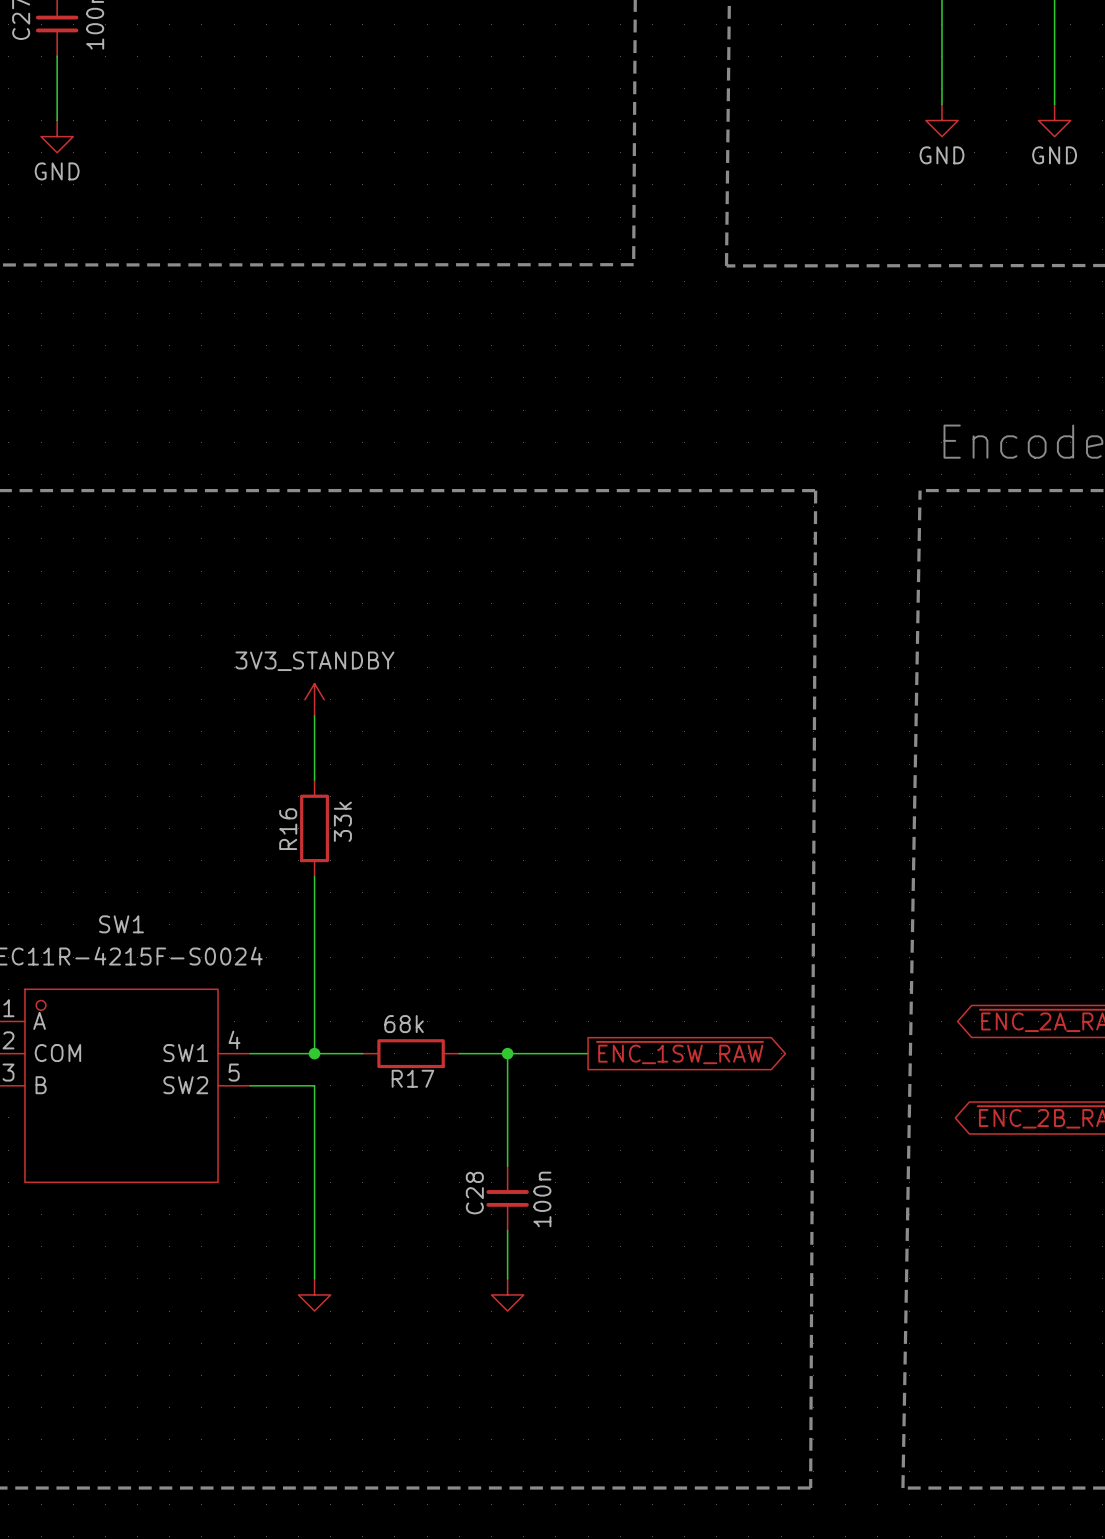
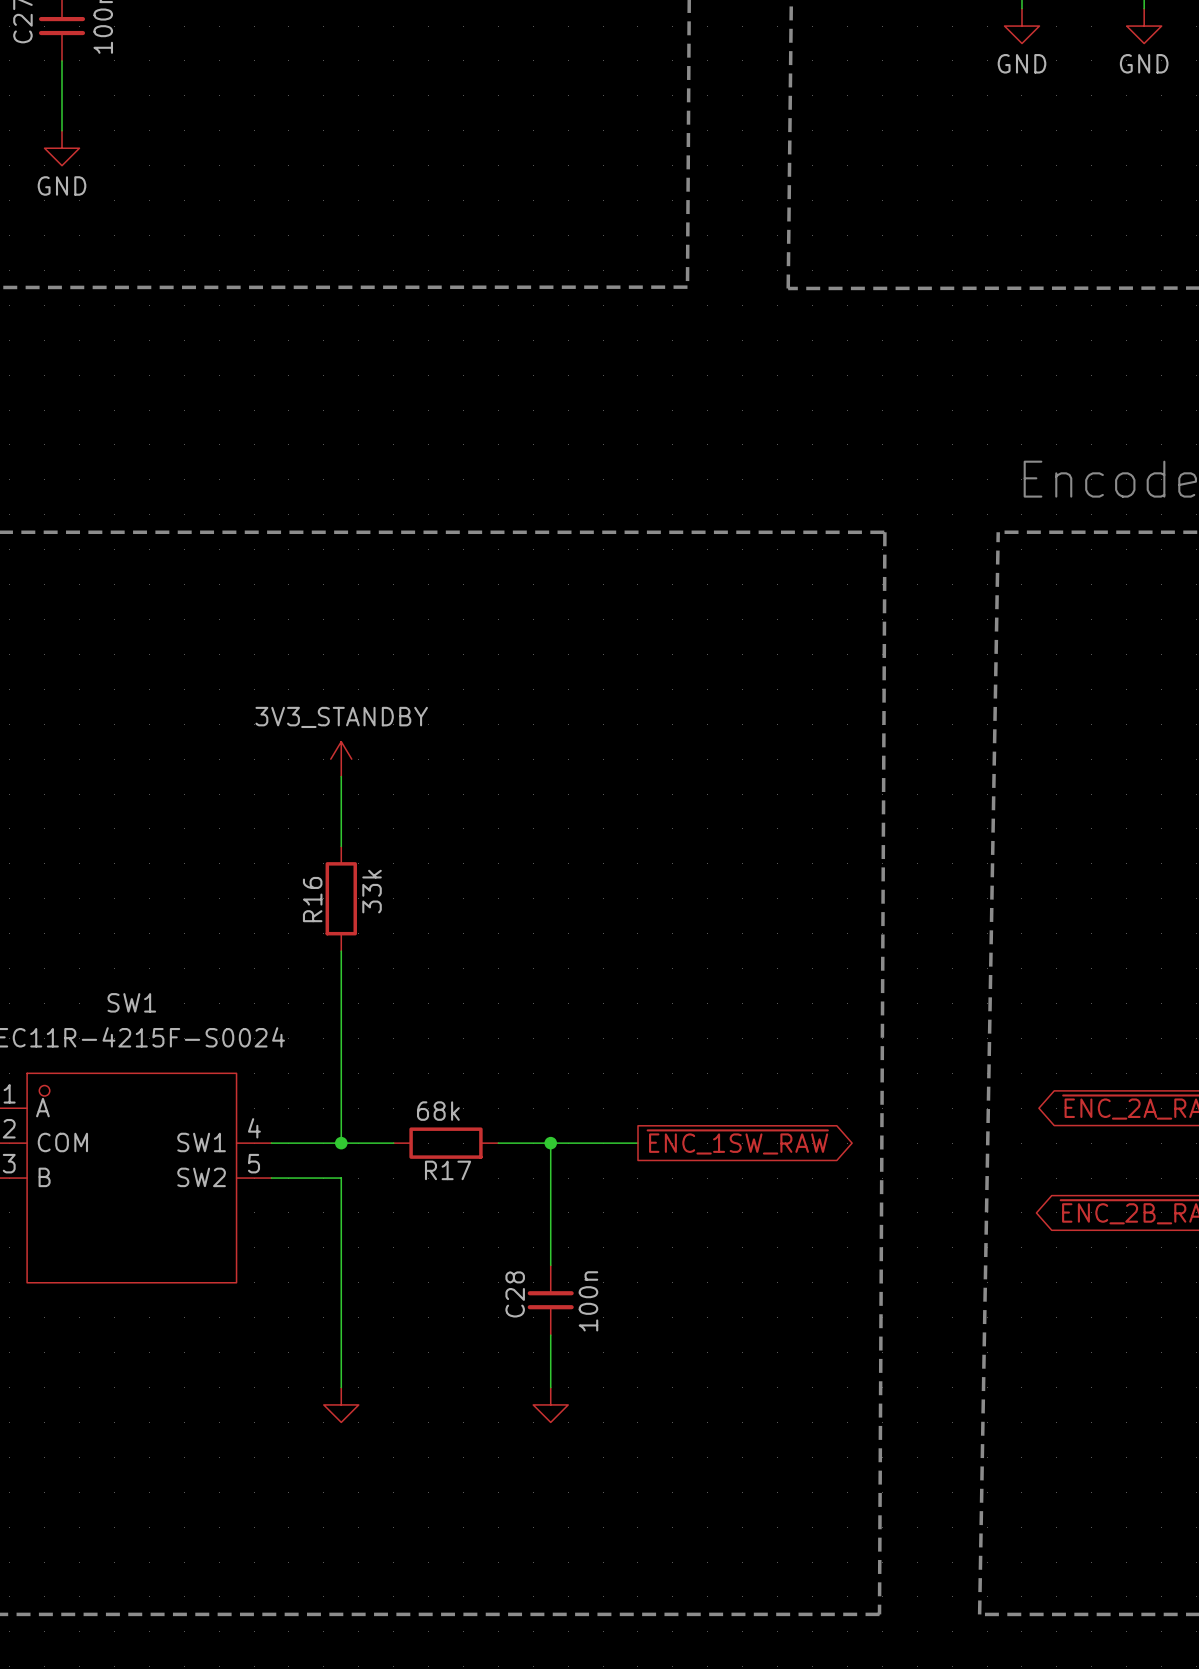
wire: (941, 7) (941, 104) -> none
wire: (1054, 7) (1054, 104) -> none
power symbol: none -> GND (1021, 26)
power symbol: none -> GND (1144, 26)
power symbol: GND (941, 120) -> none
power symbol: GND (1054, 120) -> none

